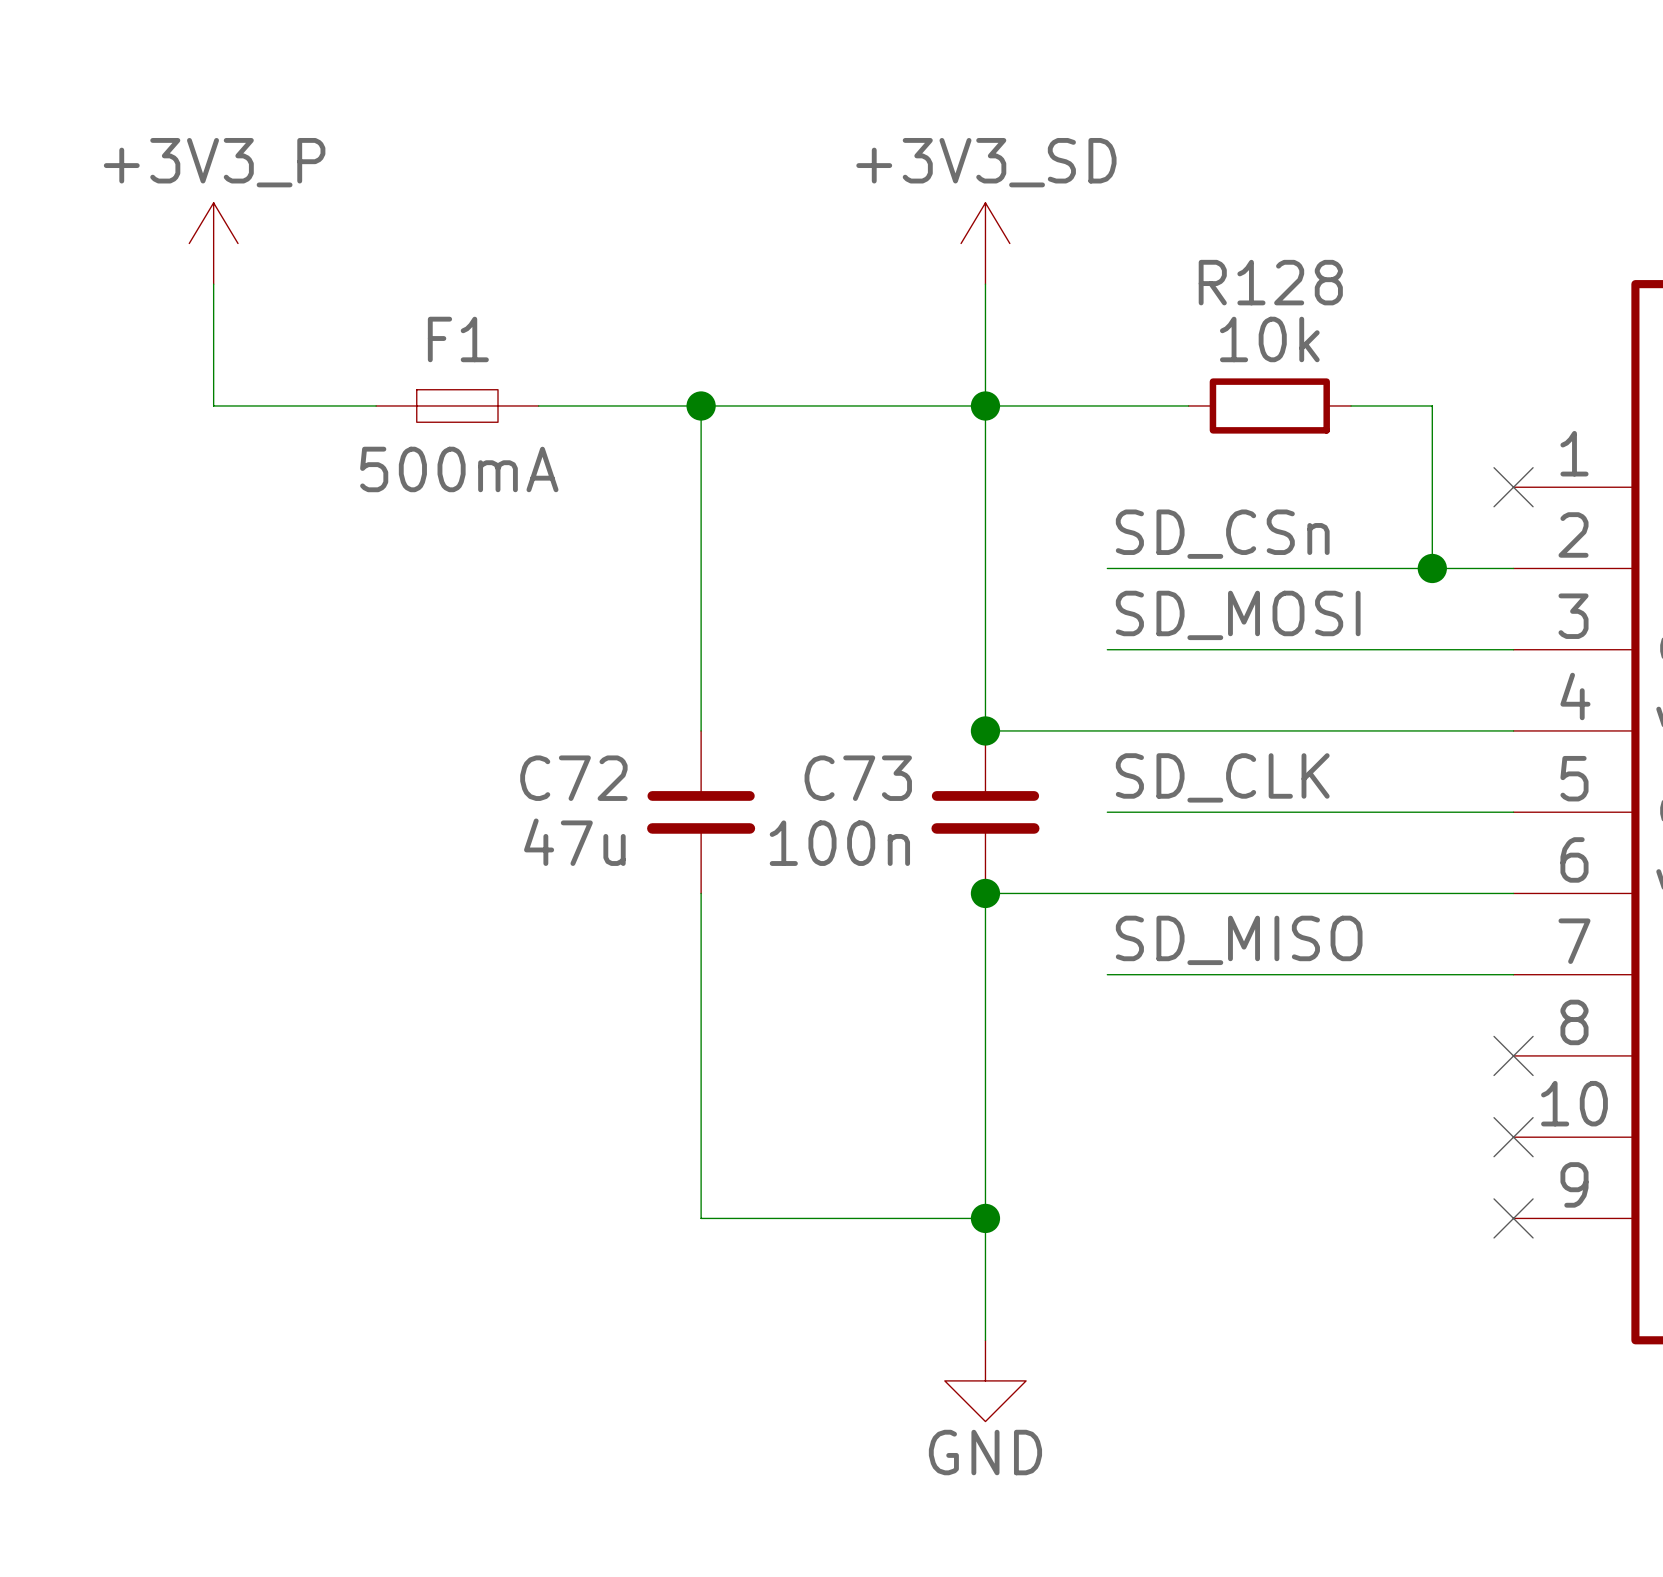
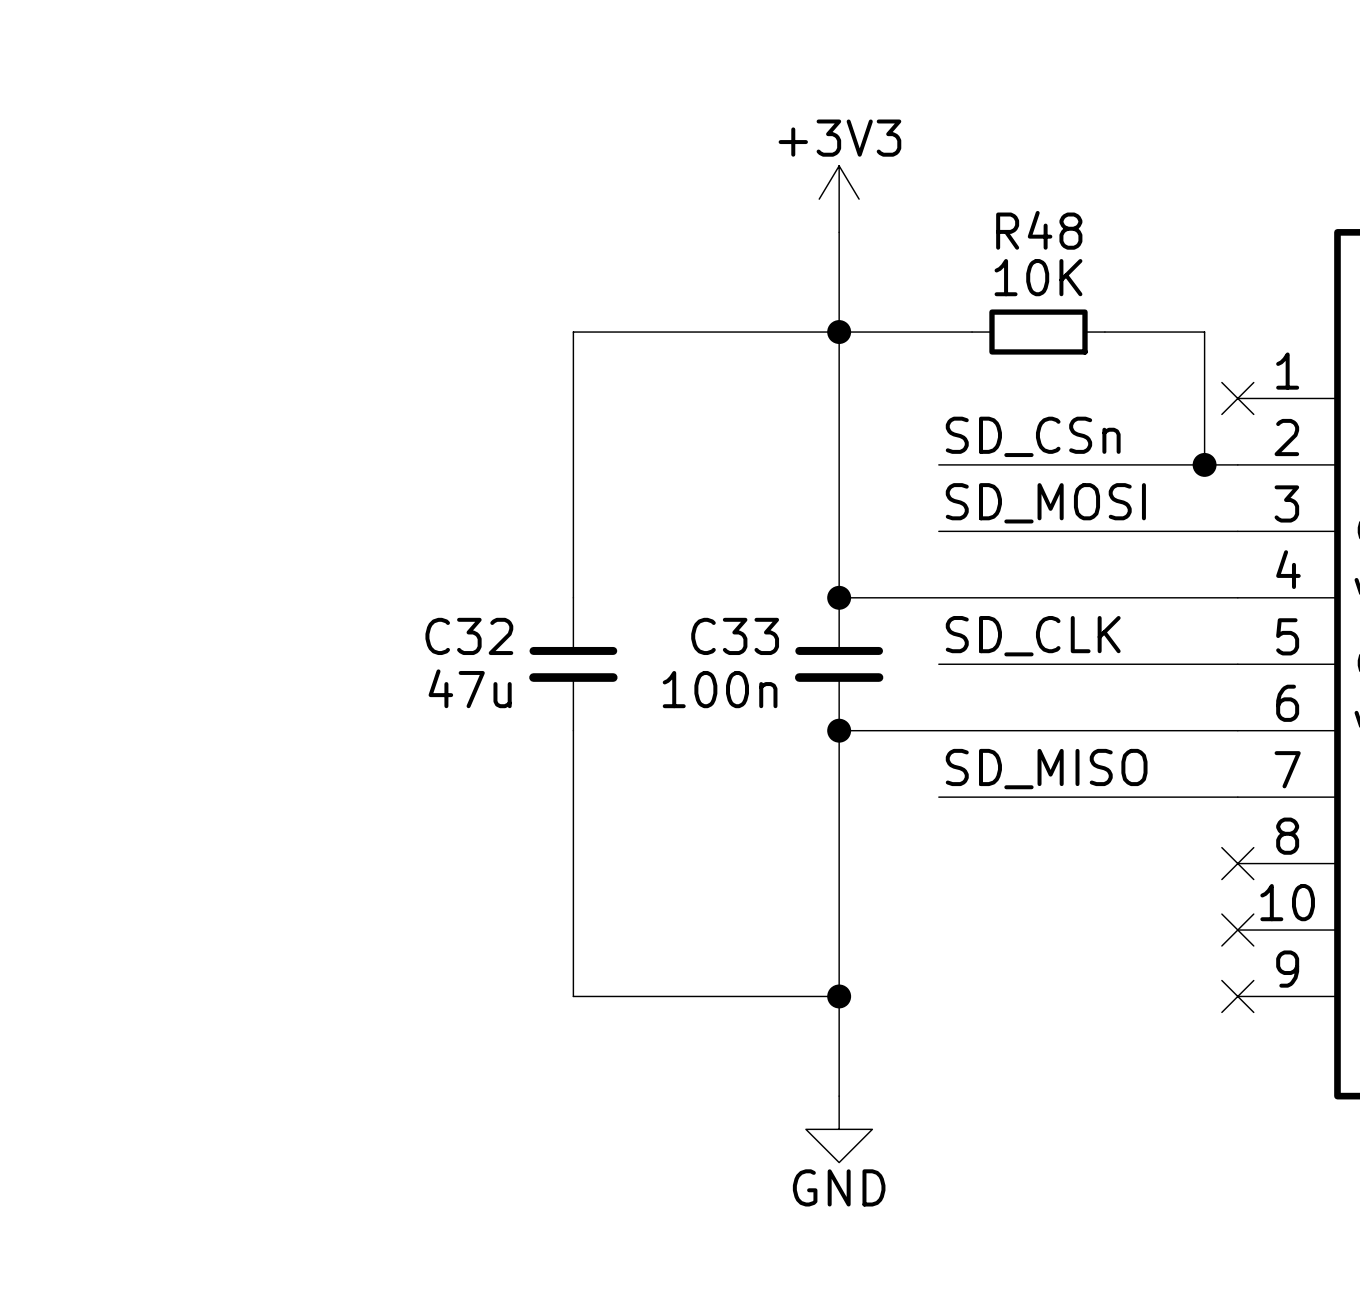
power symbol: +3V3_P (213, 243) -> none
power symbol: +3V3_SD (985, 243) -> none
power symbol: none -> +3V3 (839, 199)
R128 name: R128 (1270, 282) -> R48 (1039, 230)
wire: (213, 284) (213, 405) (376, 405) -> none
wire: (985, 284) (985, 730) (1026, 730) -> (839, 232) (839, 597)
R128 value: 10k (1269, 339) -> 10K (1038, 277)
F1: 500mA (457, 405) -> none
wire: (538, 405) (701, 405) -> none
junction: (701, 405) -> none
junction position: (985, 405) -> (839, 332)
wire: (1432, 405) (1432, 568) -> (1171, 332) (1204, 332) (1204, 464)
label position: SD_CSn (1222, 534) -> SD_CSn (1033, 436)
wire: (1107, 568) (1147, 568) -> none
junction position: (1432, 568) -> (1204, 464)
label position: SD_MOSI (1238, 615) -> SD_MOSI (1045, 503)
wire: (1107, 649) (1147, 649) -> none
junction position: (985, 730) -> (839, 597)
label position: SD_CLK (1222, 777) -> SD_CLK (1033, 636)
C72 name: C72 (573, 778) -> C32 (469, 636)
C73: 100n (985, 812) -> none
C33: none -> 100n (839, 664)
wire: (1107, 812) (1147, 812) -> none
junction position: (985, 893) -> (839, 730)
wire: (1026, 893) (985, 893) (985, 1340) -> (839, 730) (839, 1096)
label position: SD_MISO (1239, 940) -> SD_MISO (1046, 769)
wire: (1107, 974) (1147, 974) -> (805, 996) (839, 996)
junction position: (985, 1218) -> (839, 996)
power symbol position: GND (985, 1380) -> GND (839, 1129)

